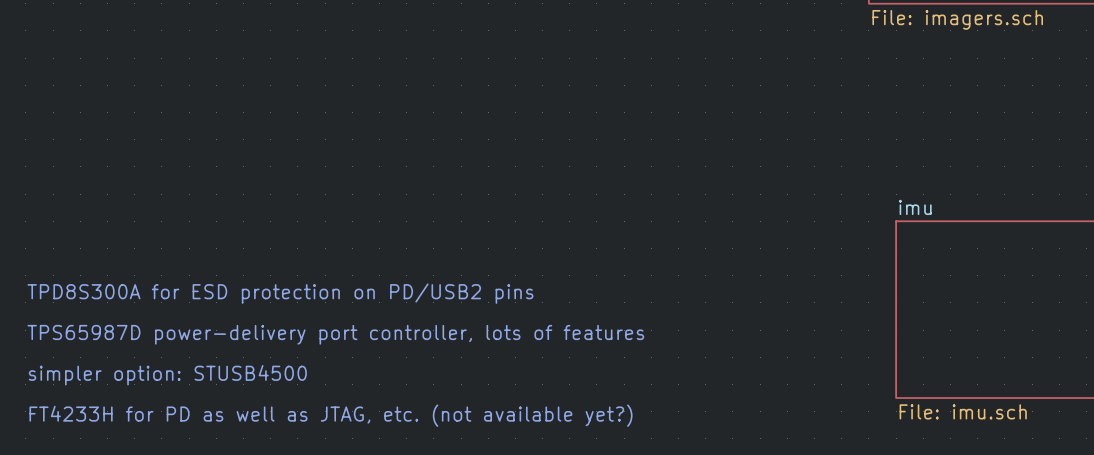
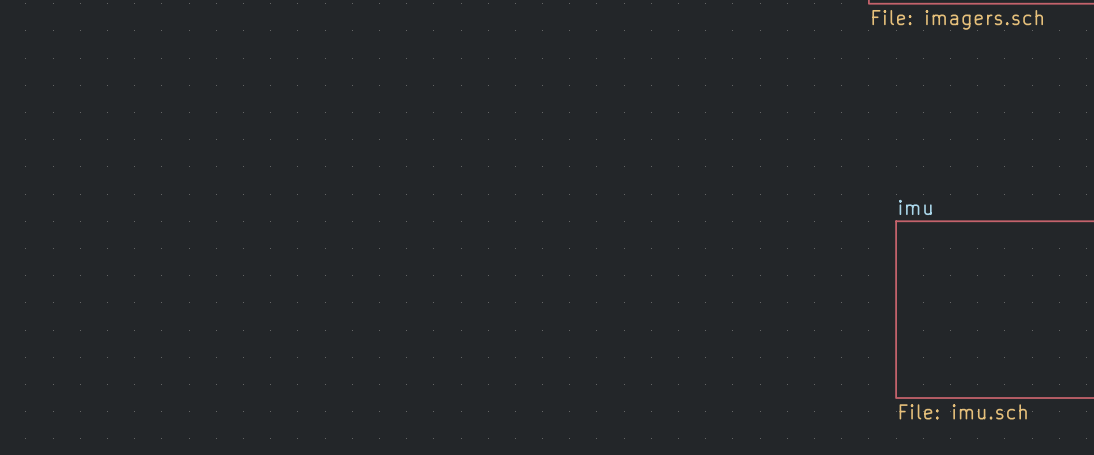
text: TPD8S300A for ESD protection on PD/USB2 pins (280, 293) -> none
text: TPS65987D power-delivery port controller, lots of features (335, 334) -> none
text: simpler option: STUSB4500 (167, 375) -> none
text: FT4233H for PD as well as JTAG, etc. (not available yet?) (330, 415) -> none

